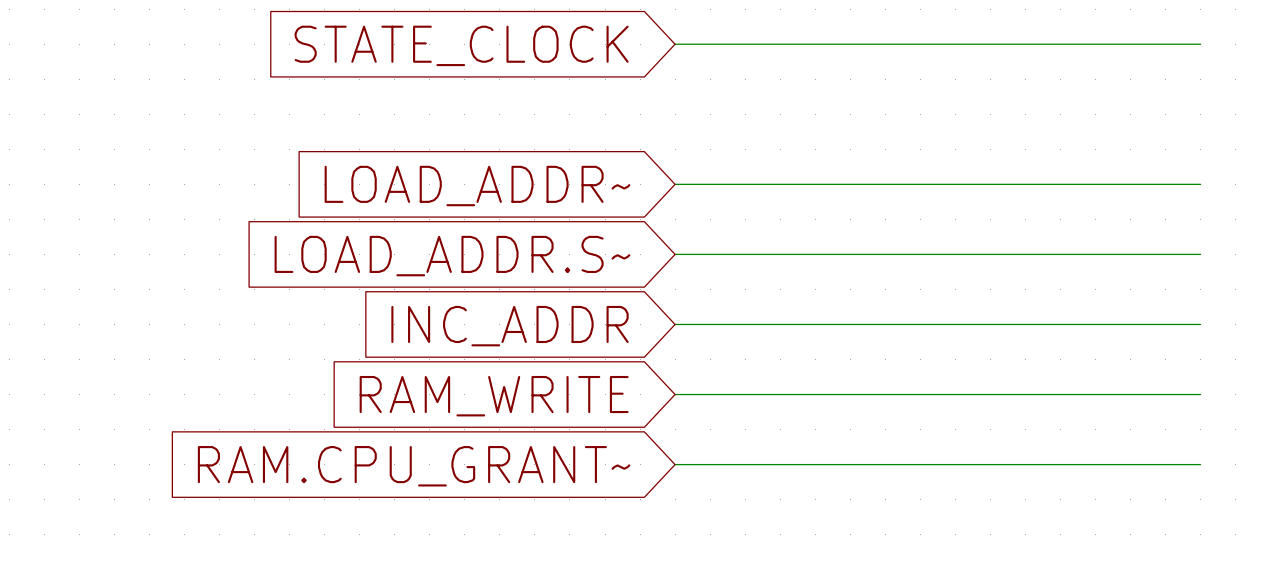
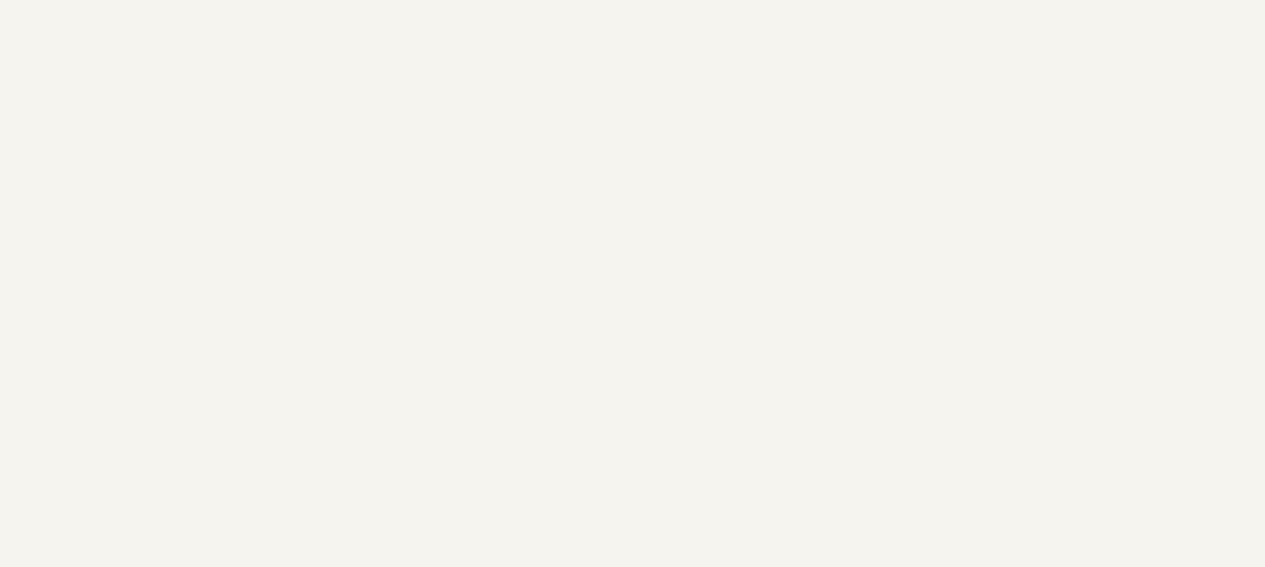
wire: (675, 44) (1200, 44) -> none
global label: STATE_CLOCK (461, 45) -> none
wire: (675, 184) (1200, 184) -> none
global label: LOAD_ADDR~ (477, 186) -> none
wire: (675, 254) (1200, 254) -> none
global label: LOAD_ADDR.S~ (452, 256) -> none
wire: (675, 324) (1200, 324) -> none
global label: INC_ADDR (510, 326) -> none
wire: (675, 394) (1200, 394) -> none
global label: RAM_WRITE (494, 396) -> none
wire: (675, 464) (1200, 464) -> none
global label: RAM.CPU_GRANT~ (414, 466) -> none

